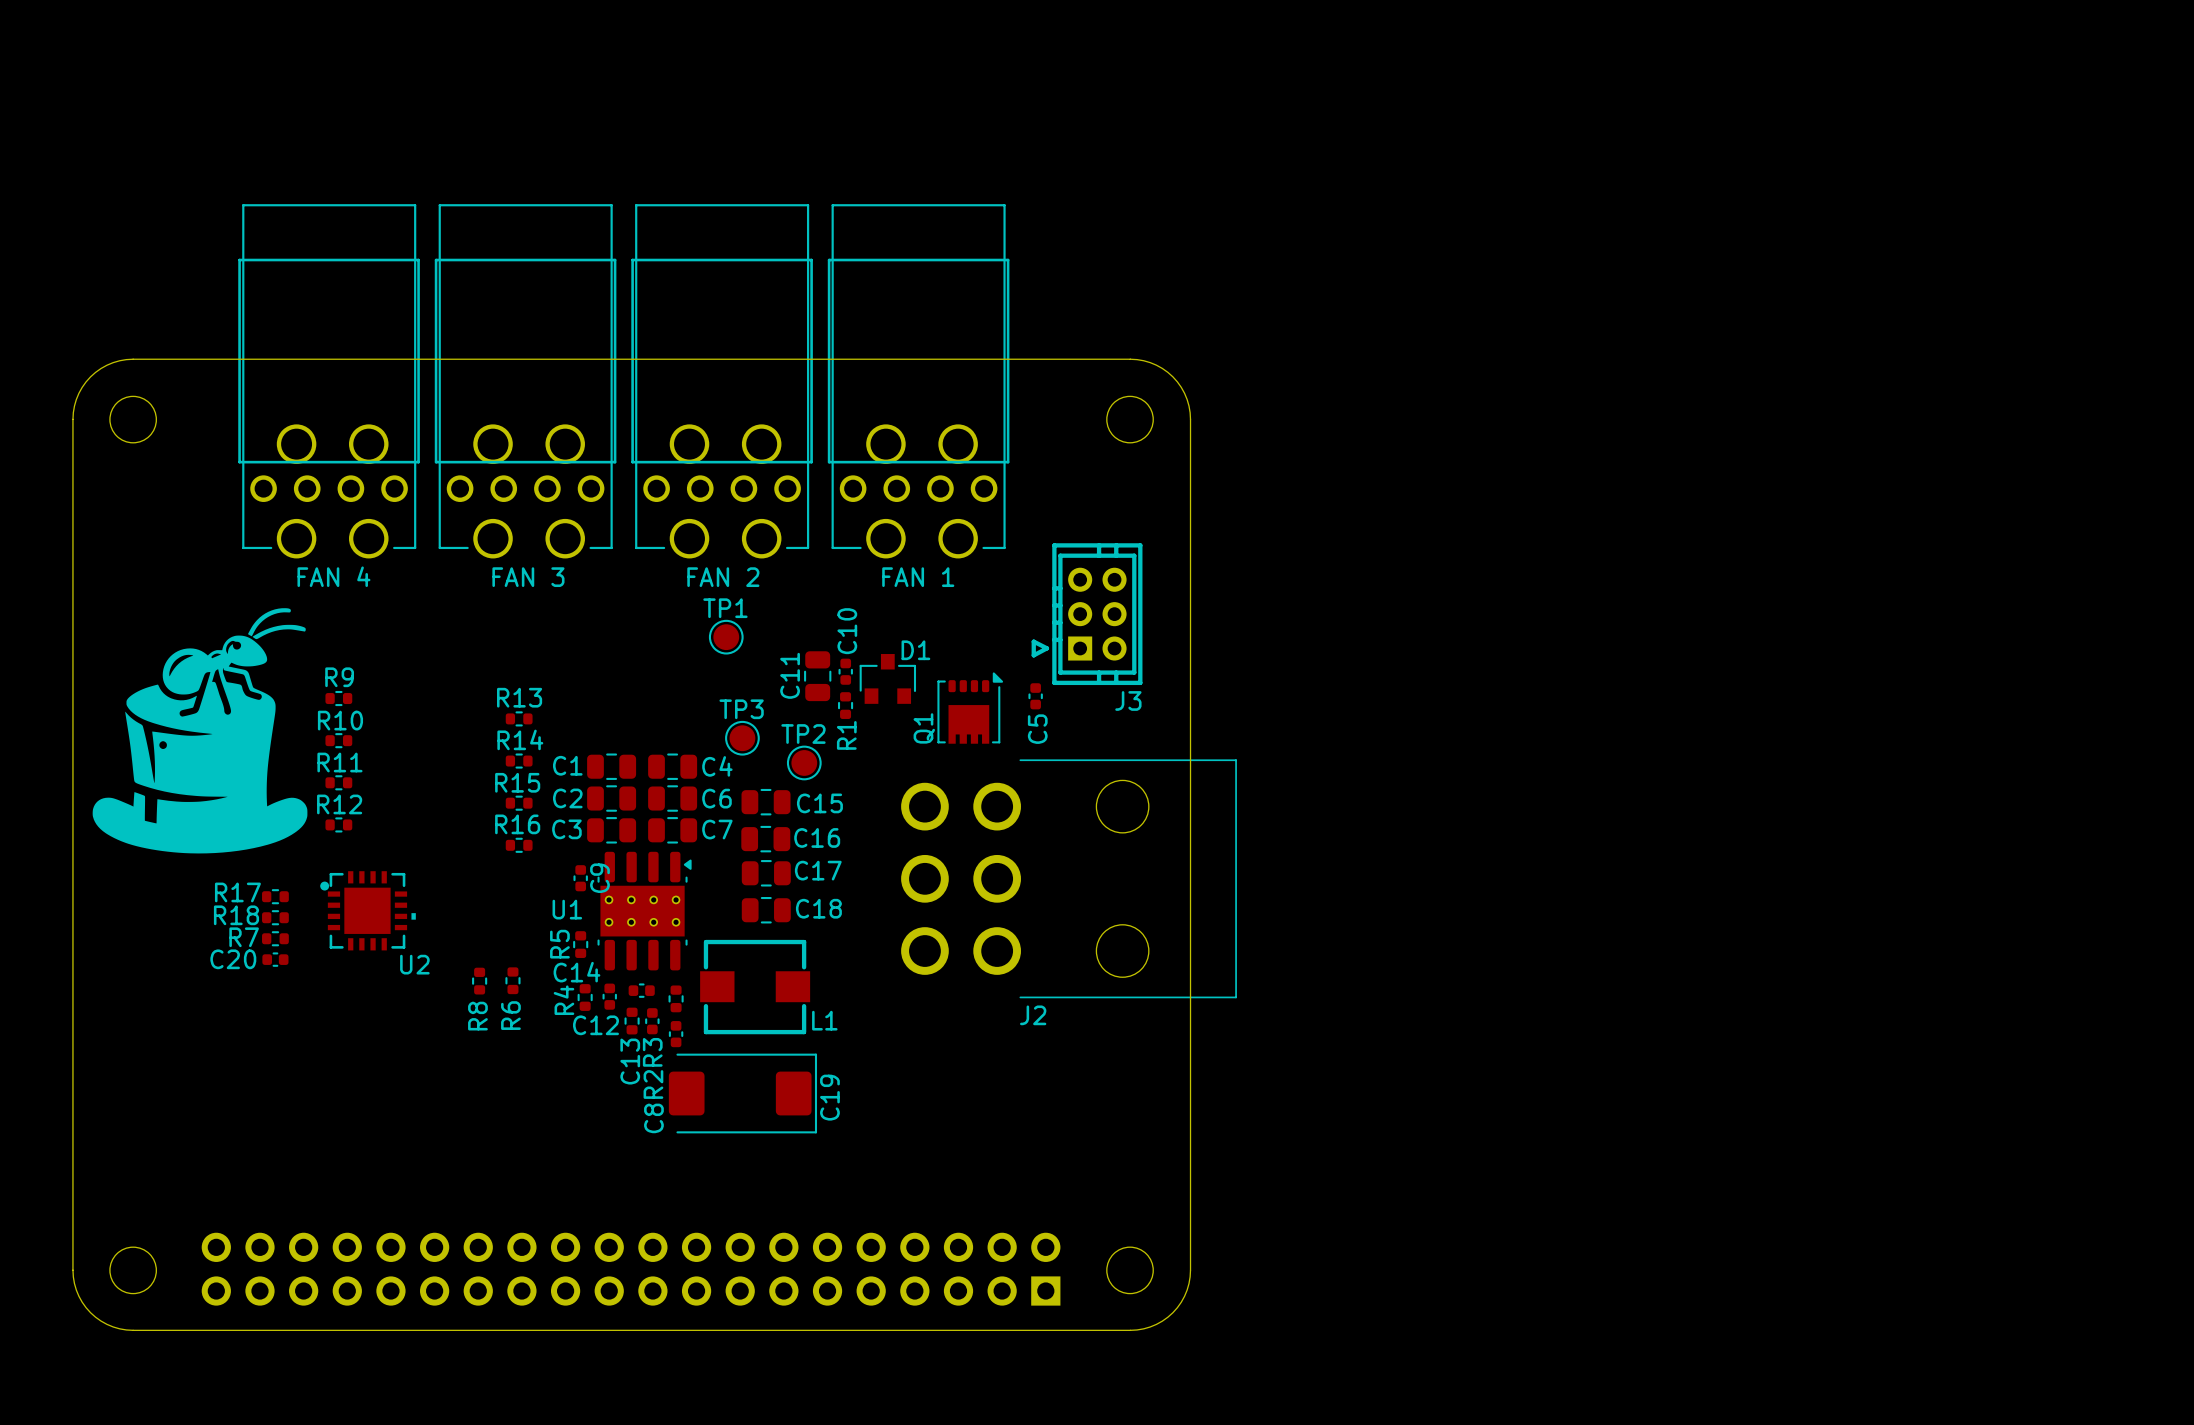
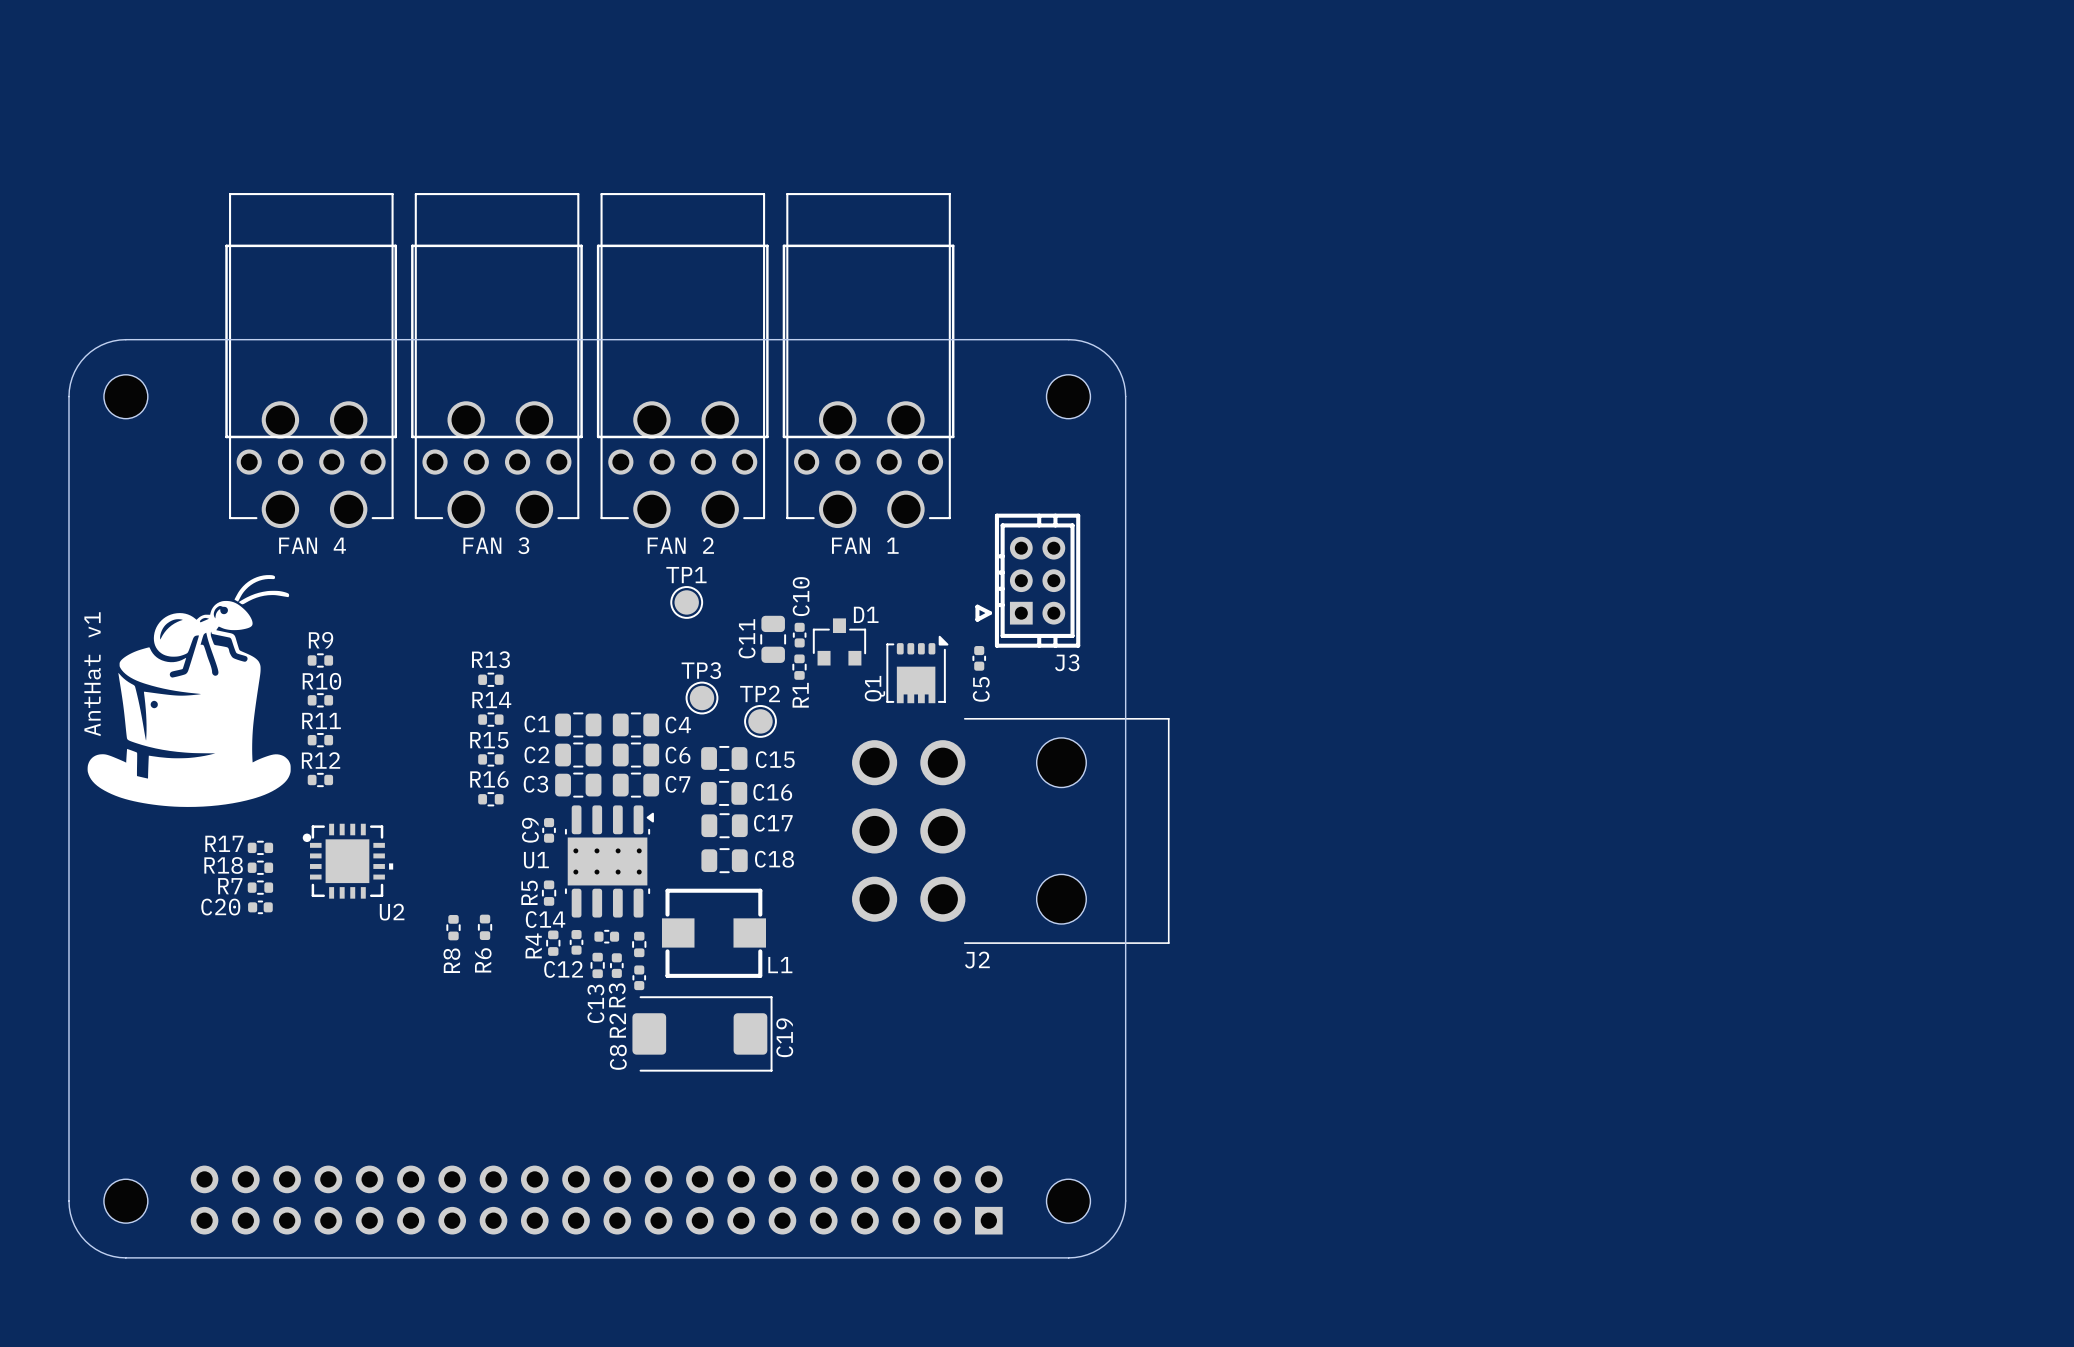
text: none -> AntHat v1 (92, 674)
C9 name position: C9 (599, 878) -> C9 (530, 830)

